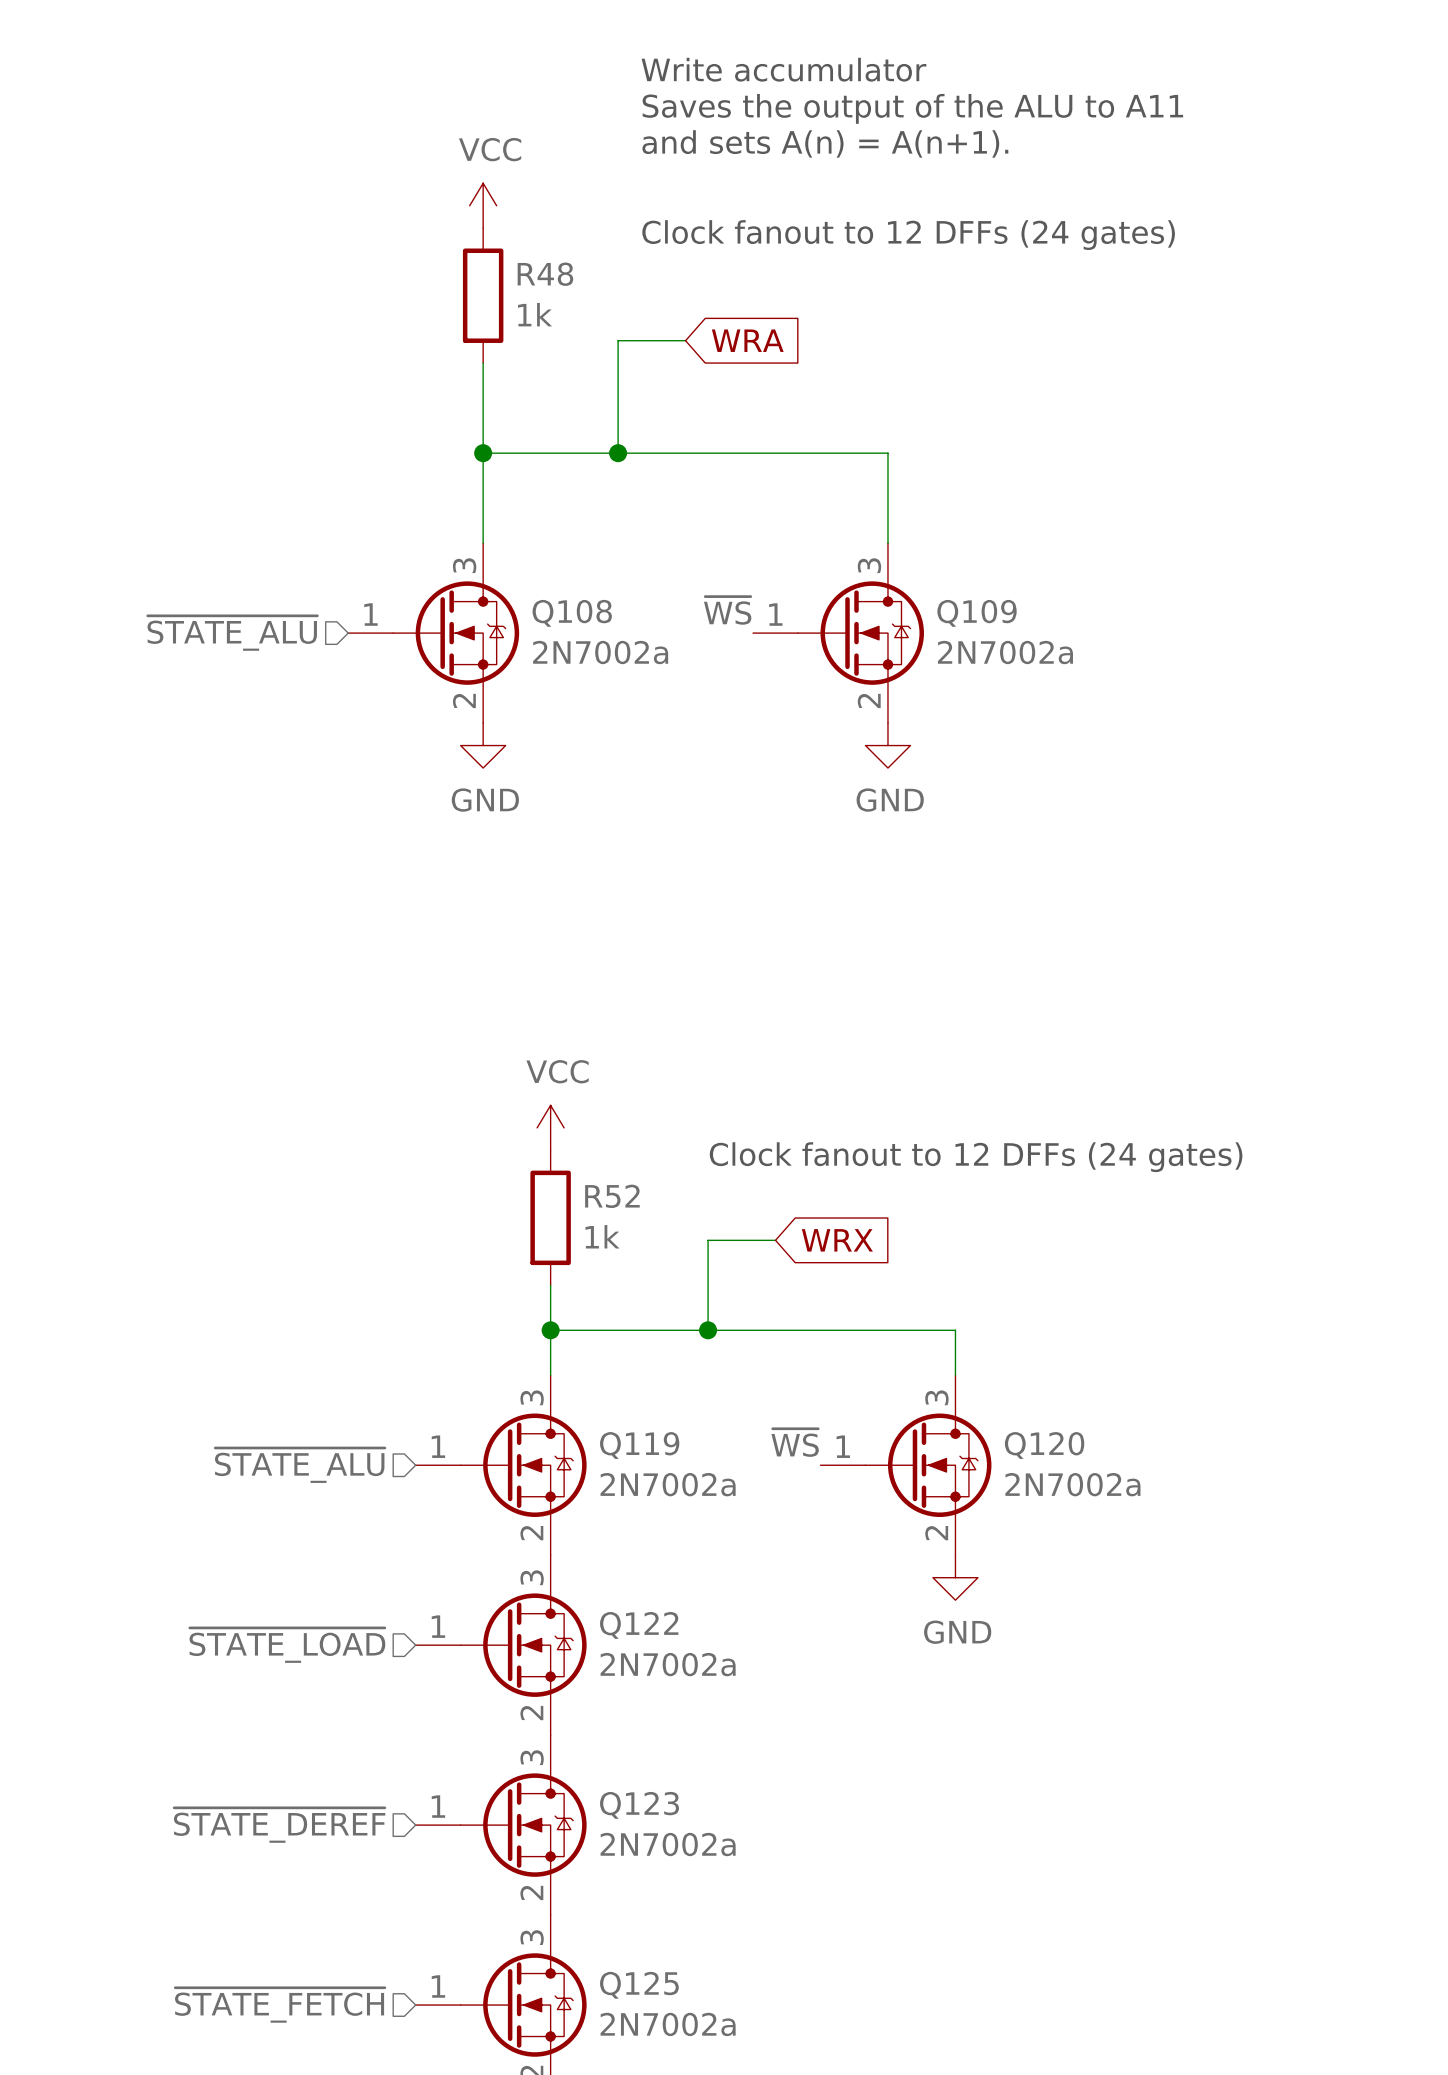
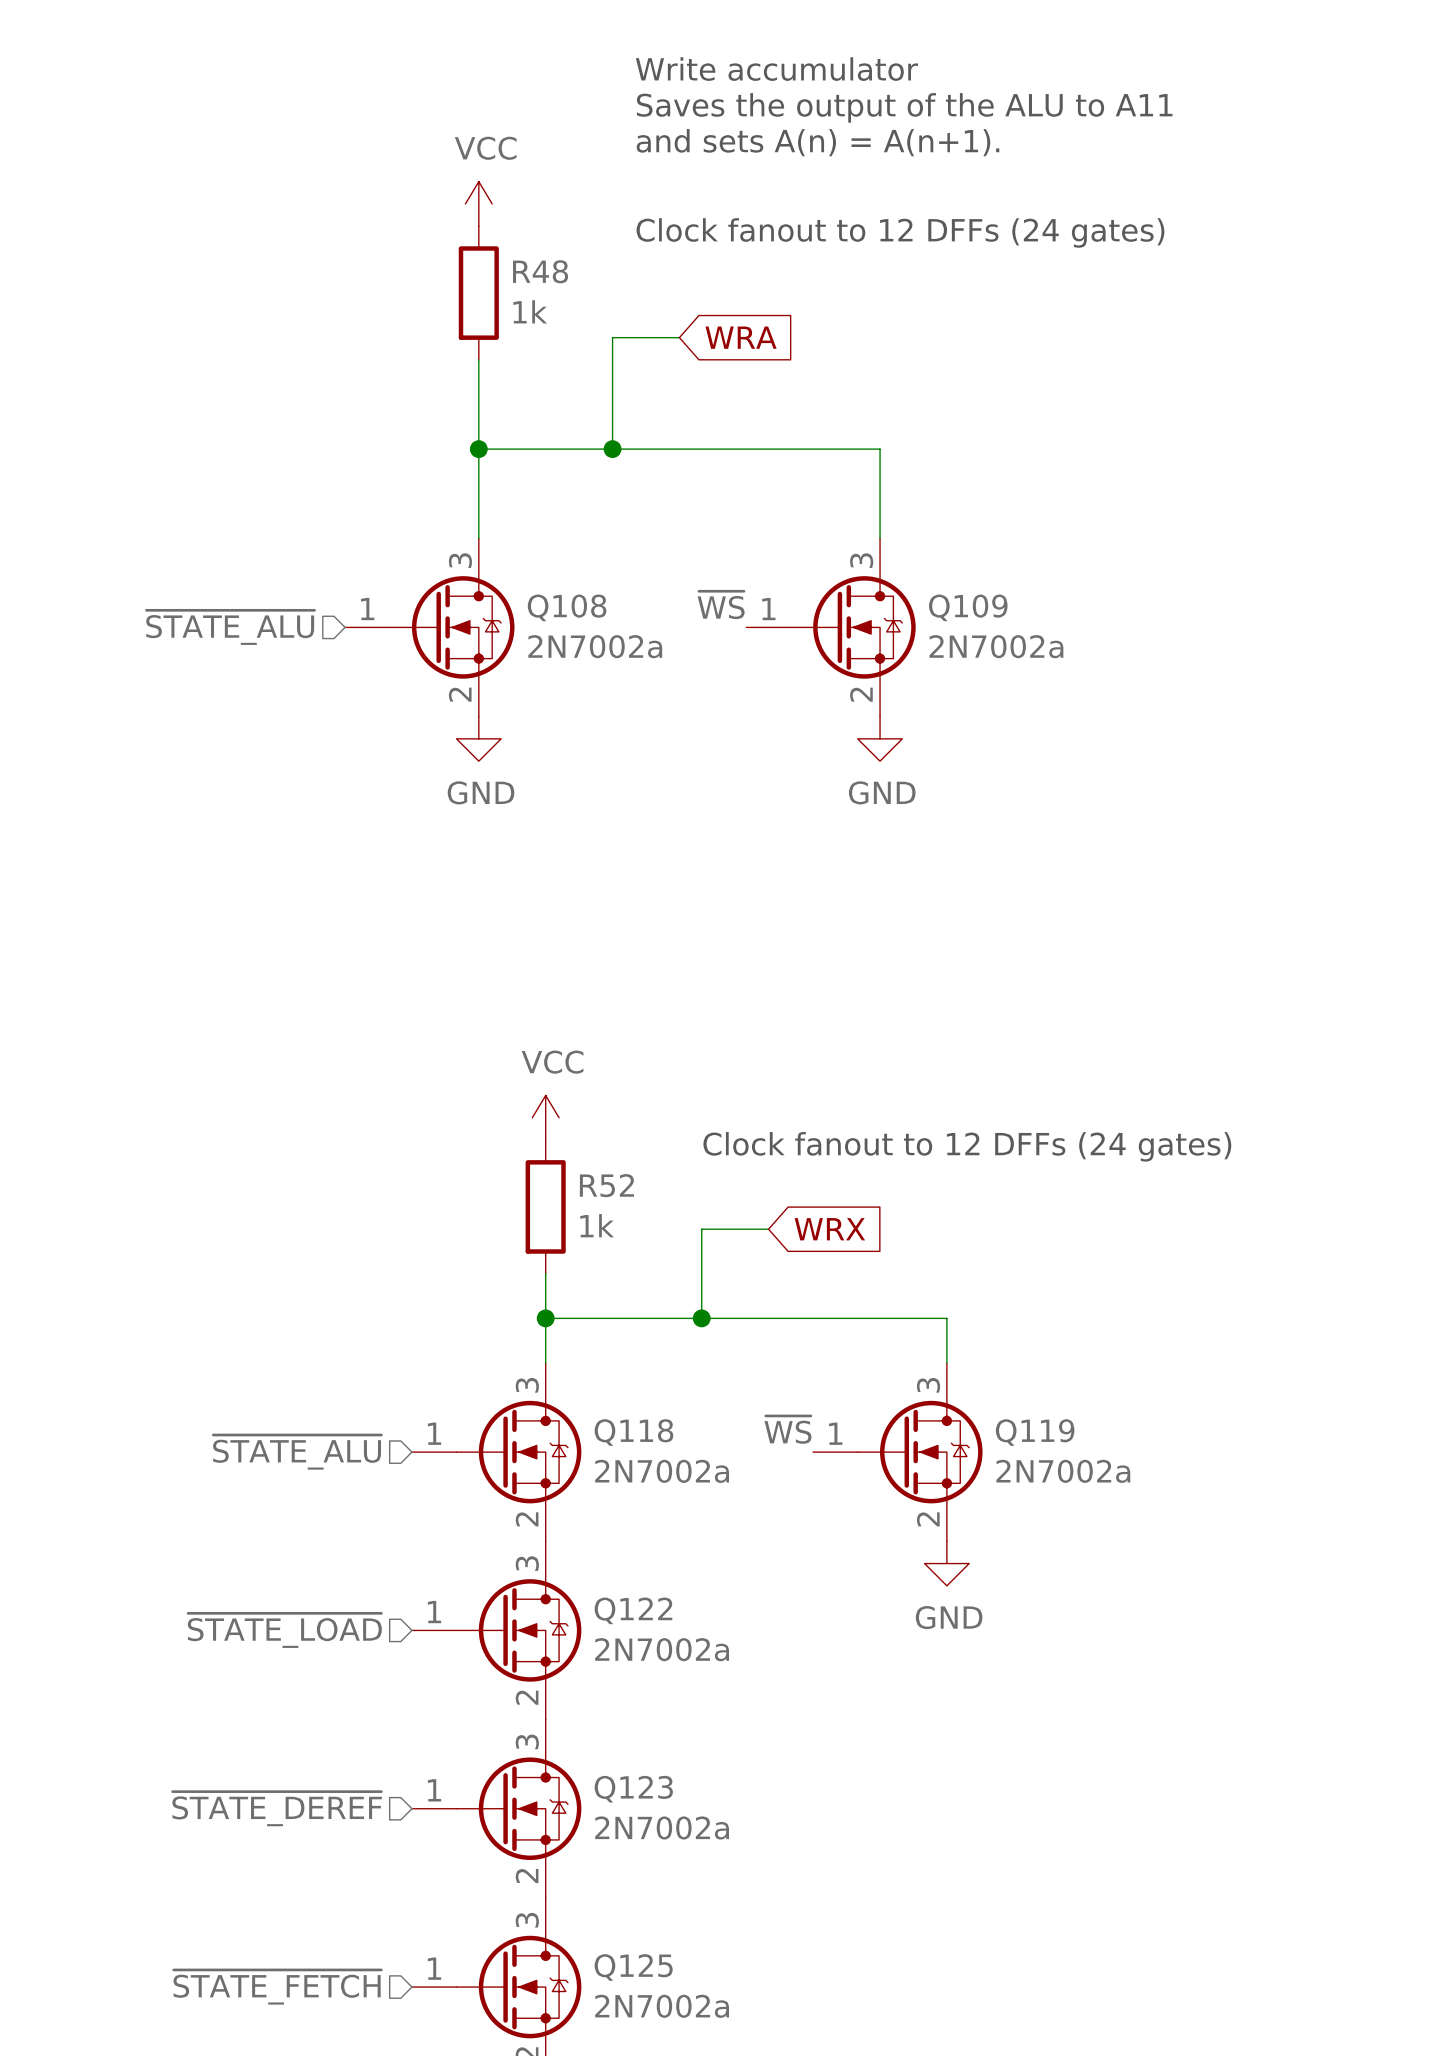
Q119 name: Q119 (639, 1445) -> Q118 (633, 1432)
Q120 name: Q120 (1044, 1445) -> Q119 (1035, 1432)

